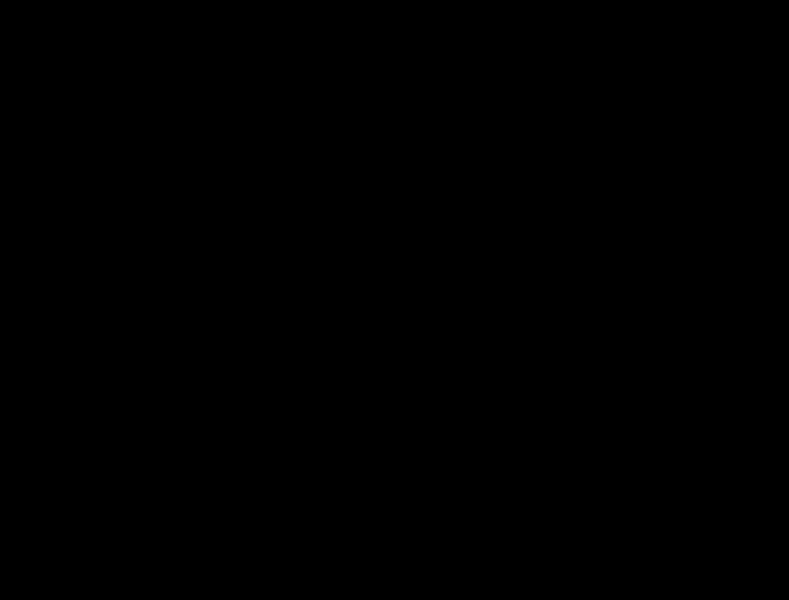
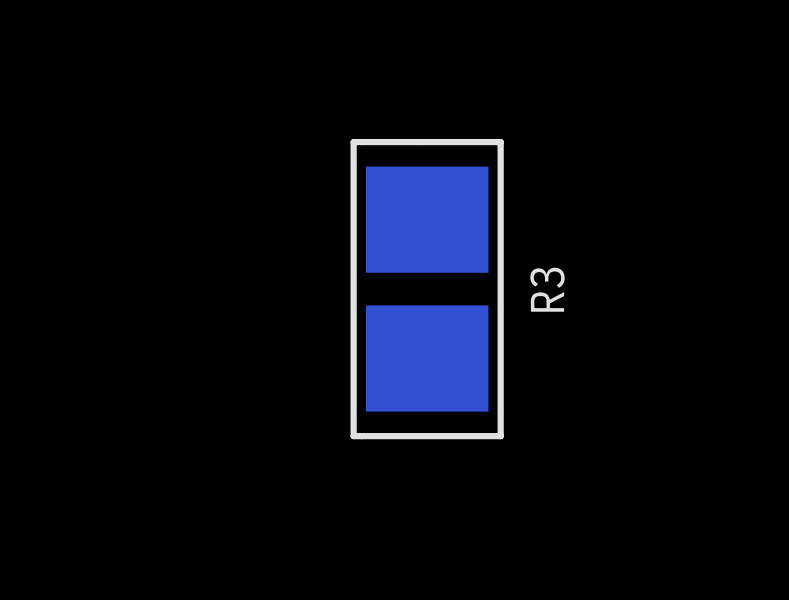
R3: none -> (427, 289)

